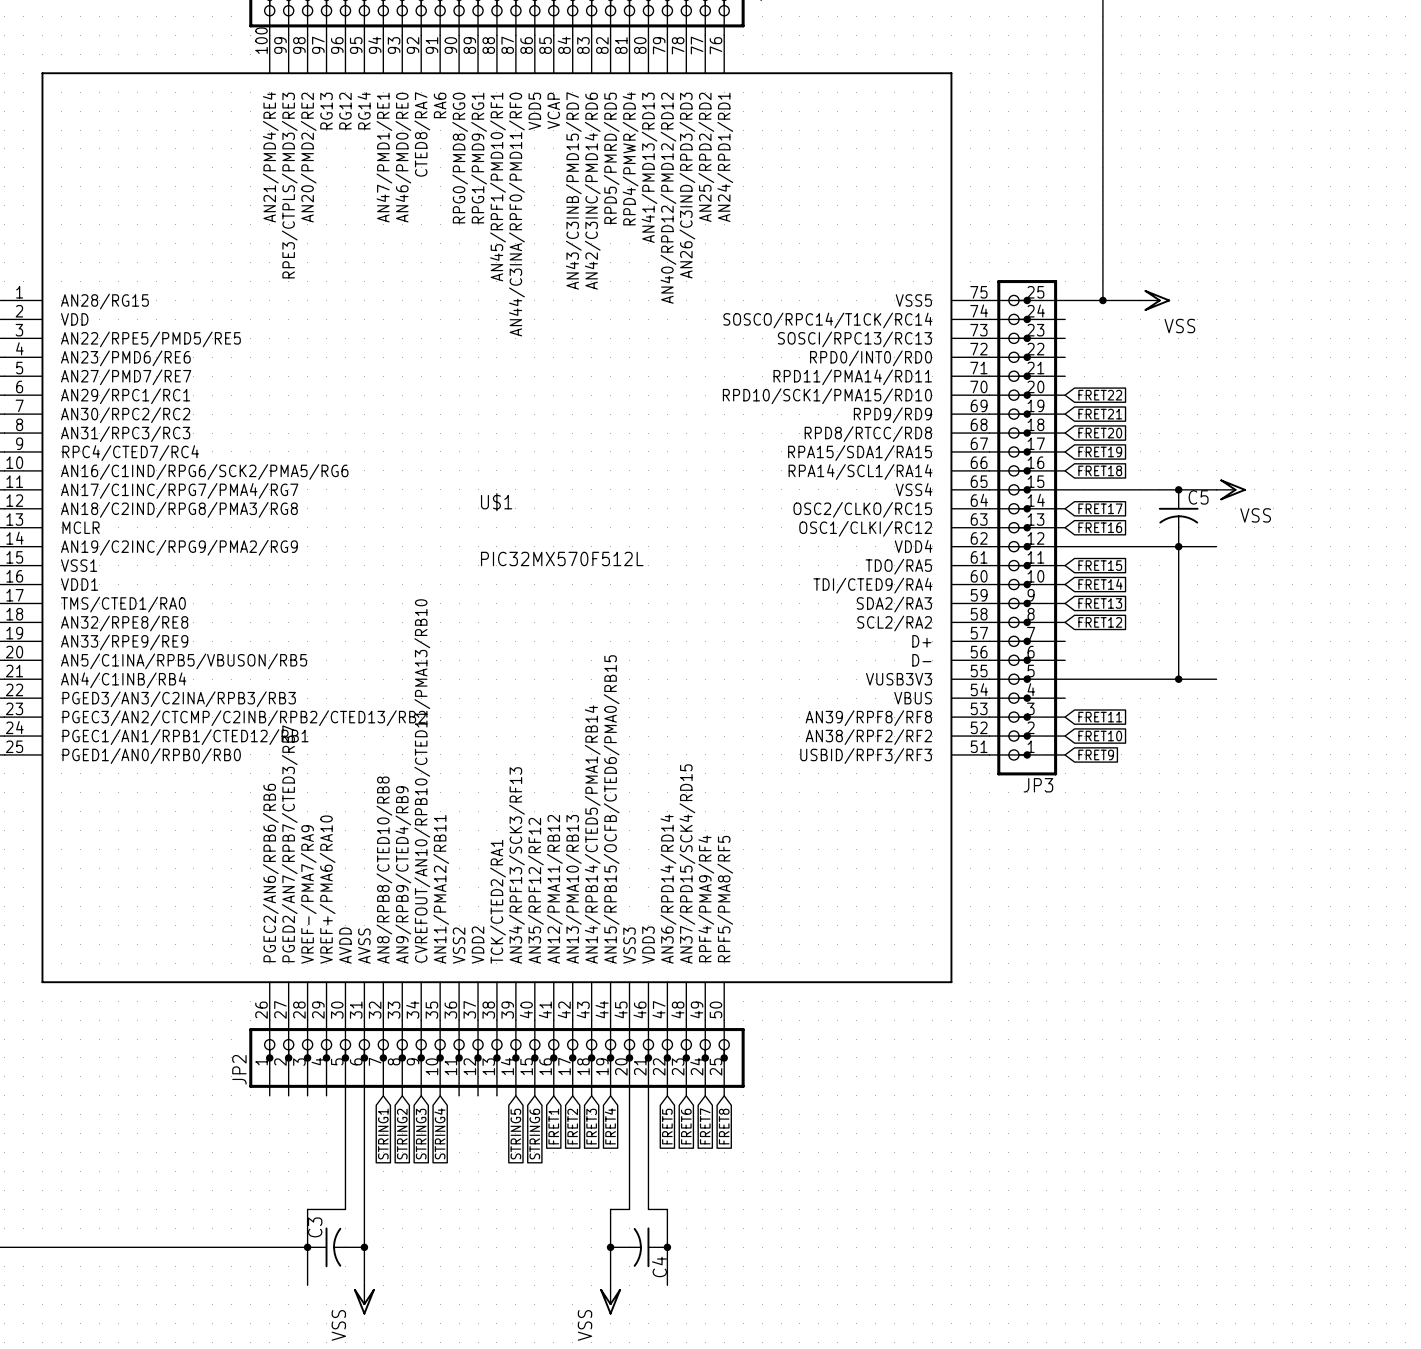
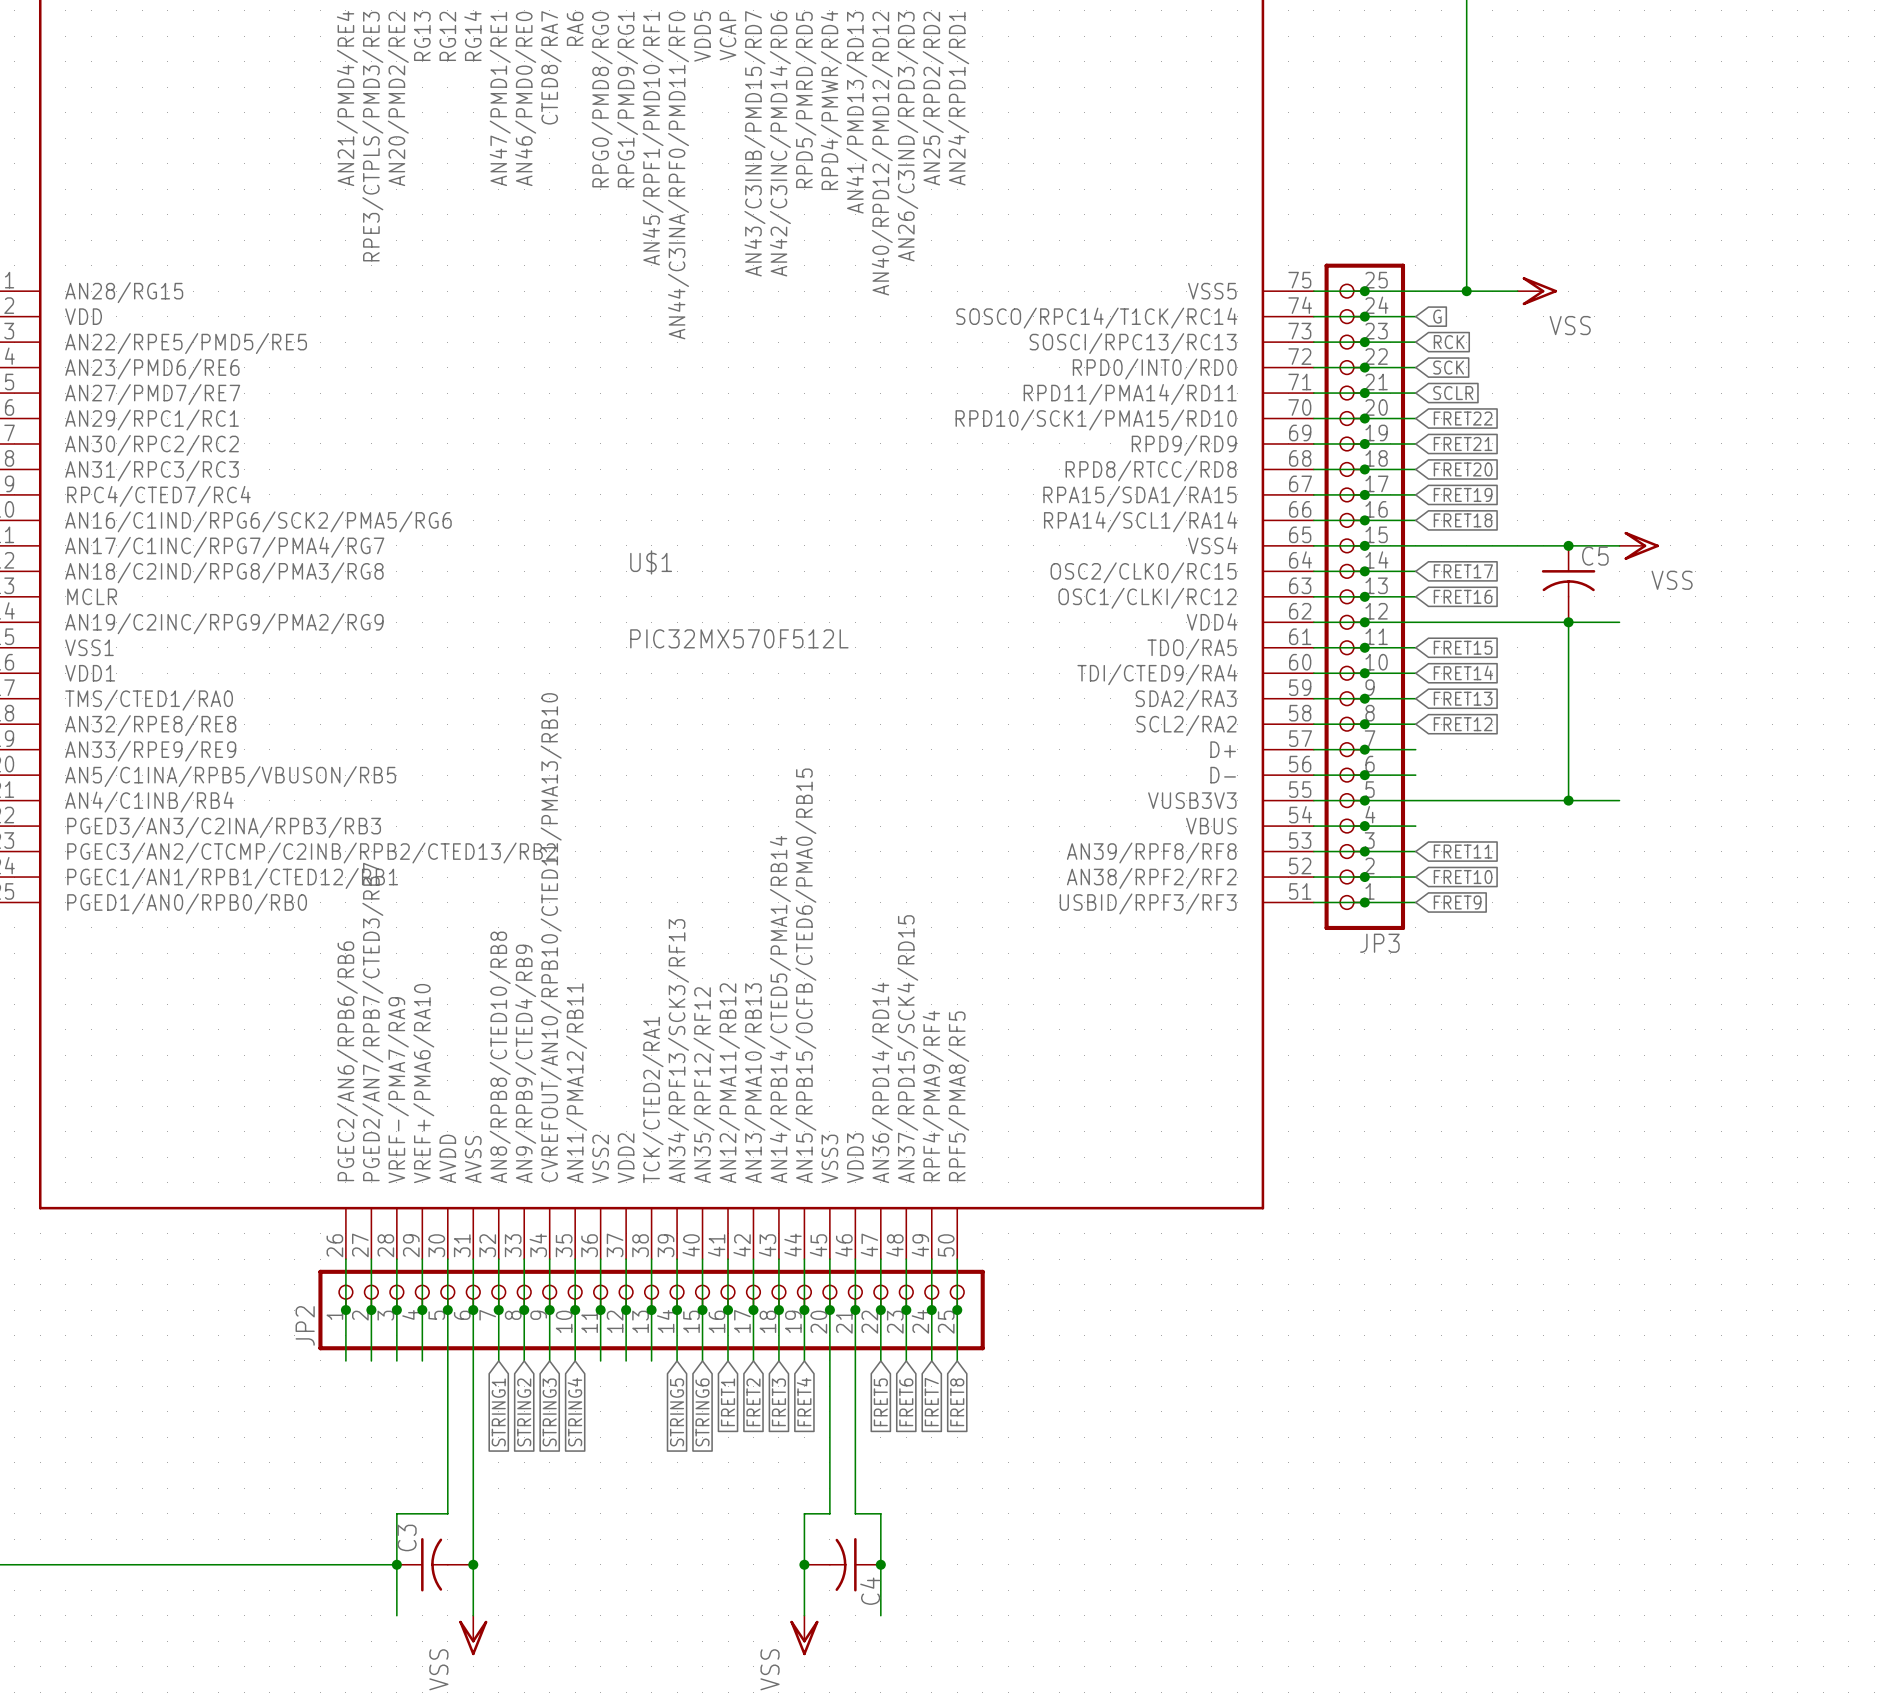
global label: none -> G (1437, 316)
global label: none -> RCK (1449, 342)
global label: none -> SCK (1448, 367)
global label: none -> SCLR (1453, 393)

